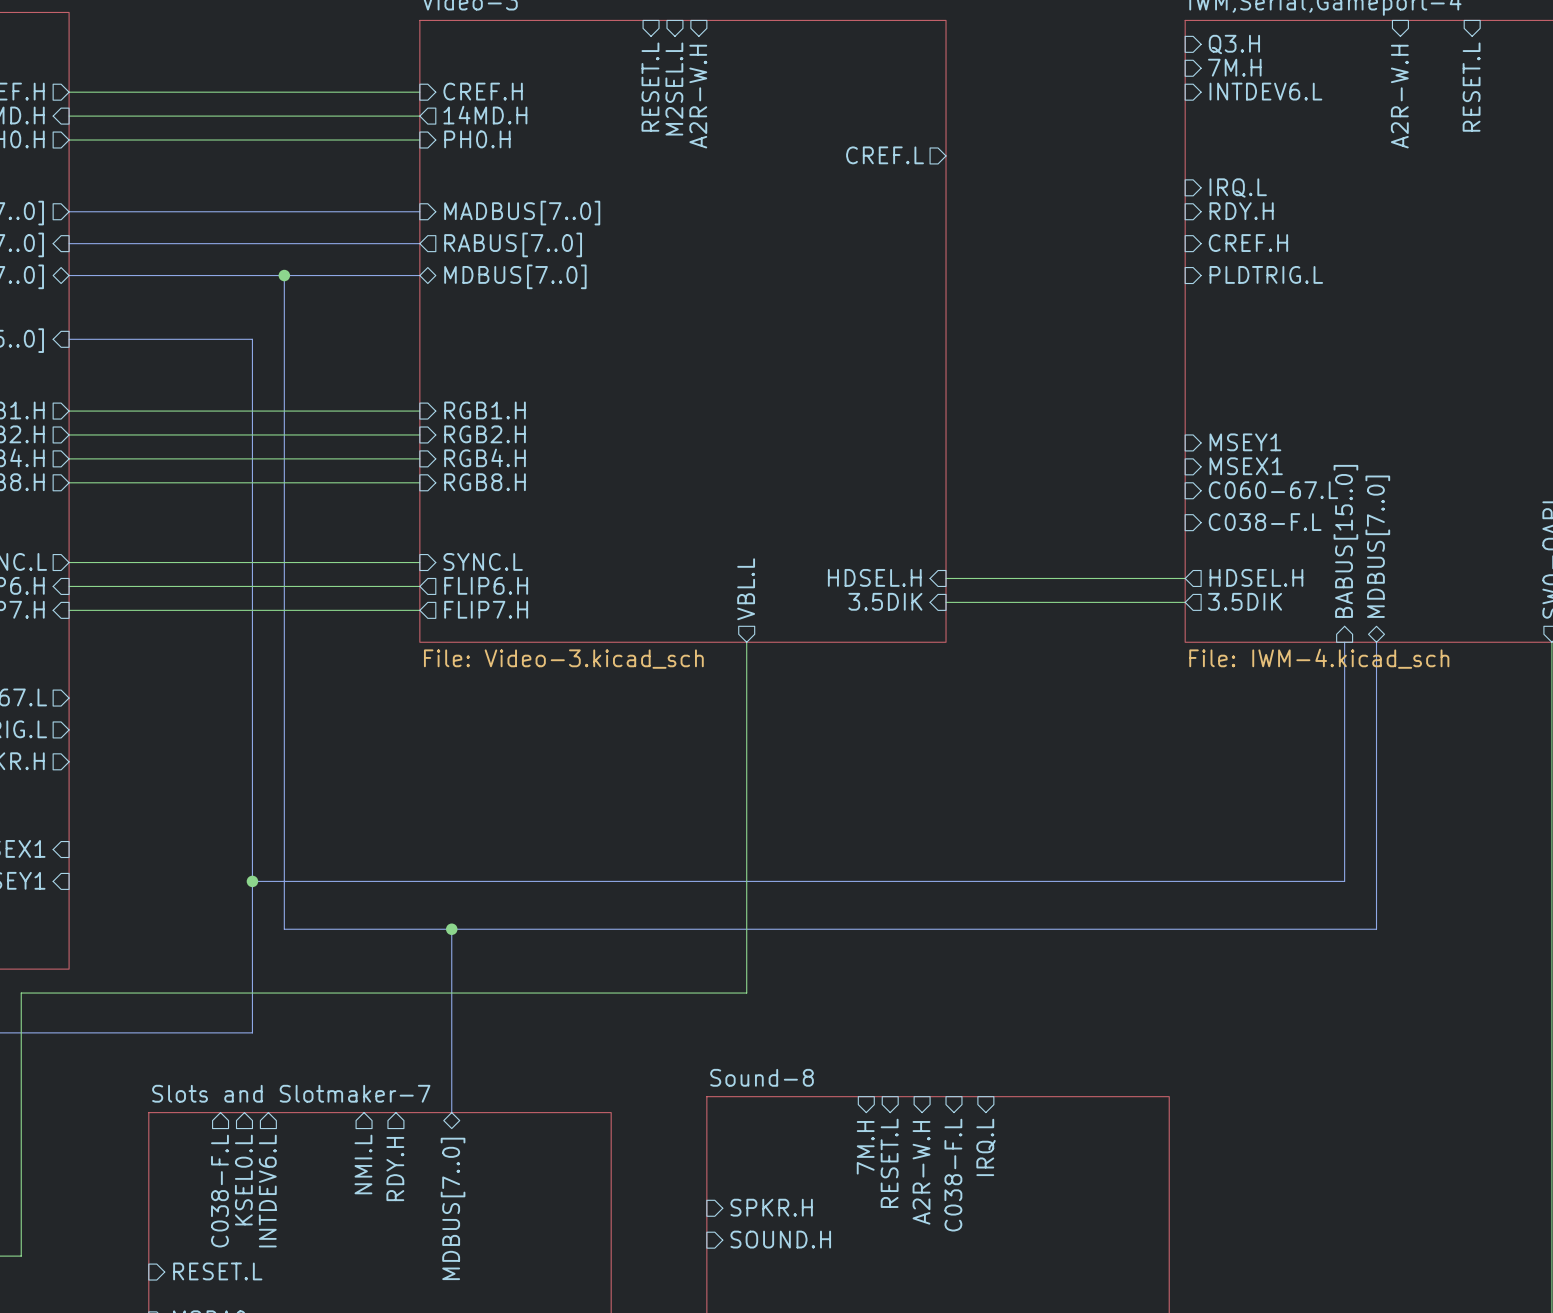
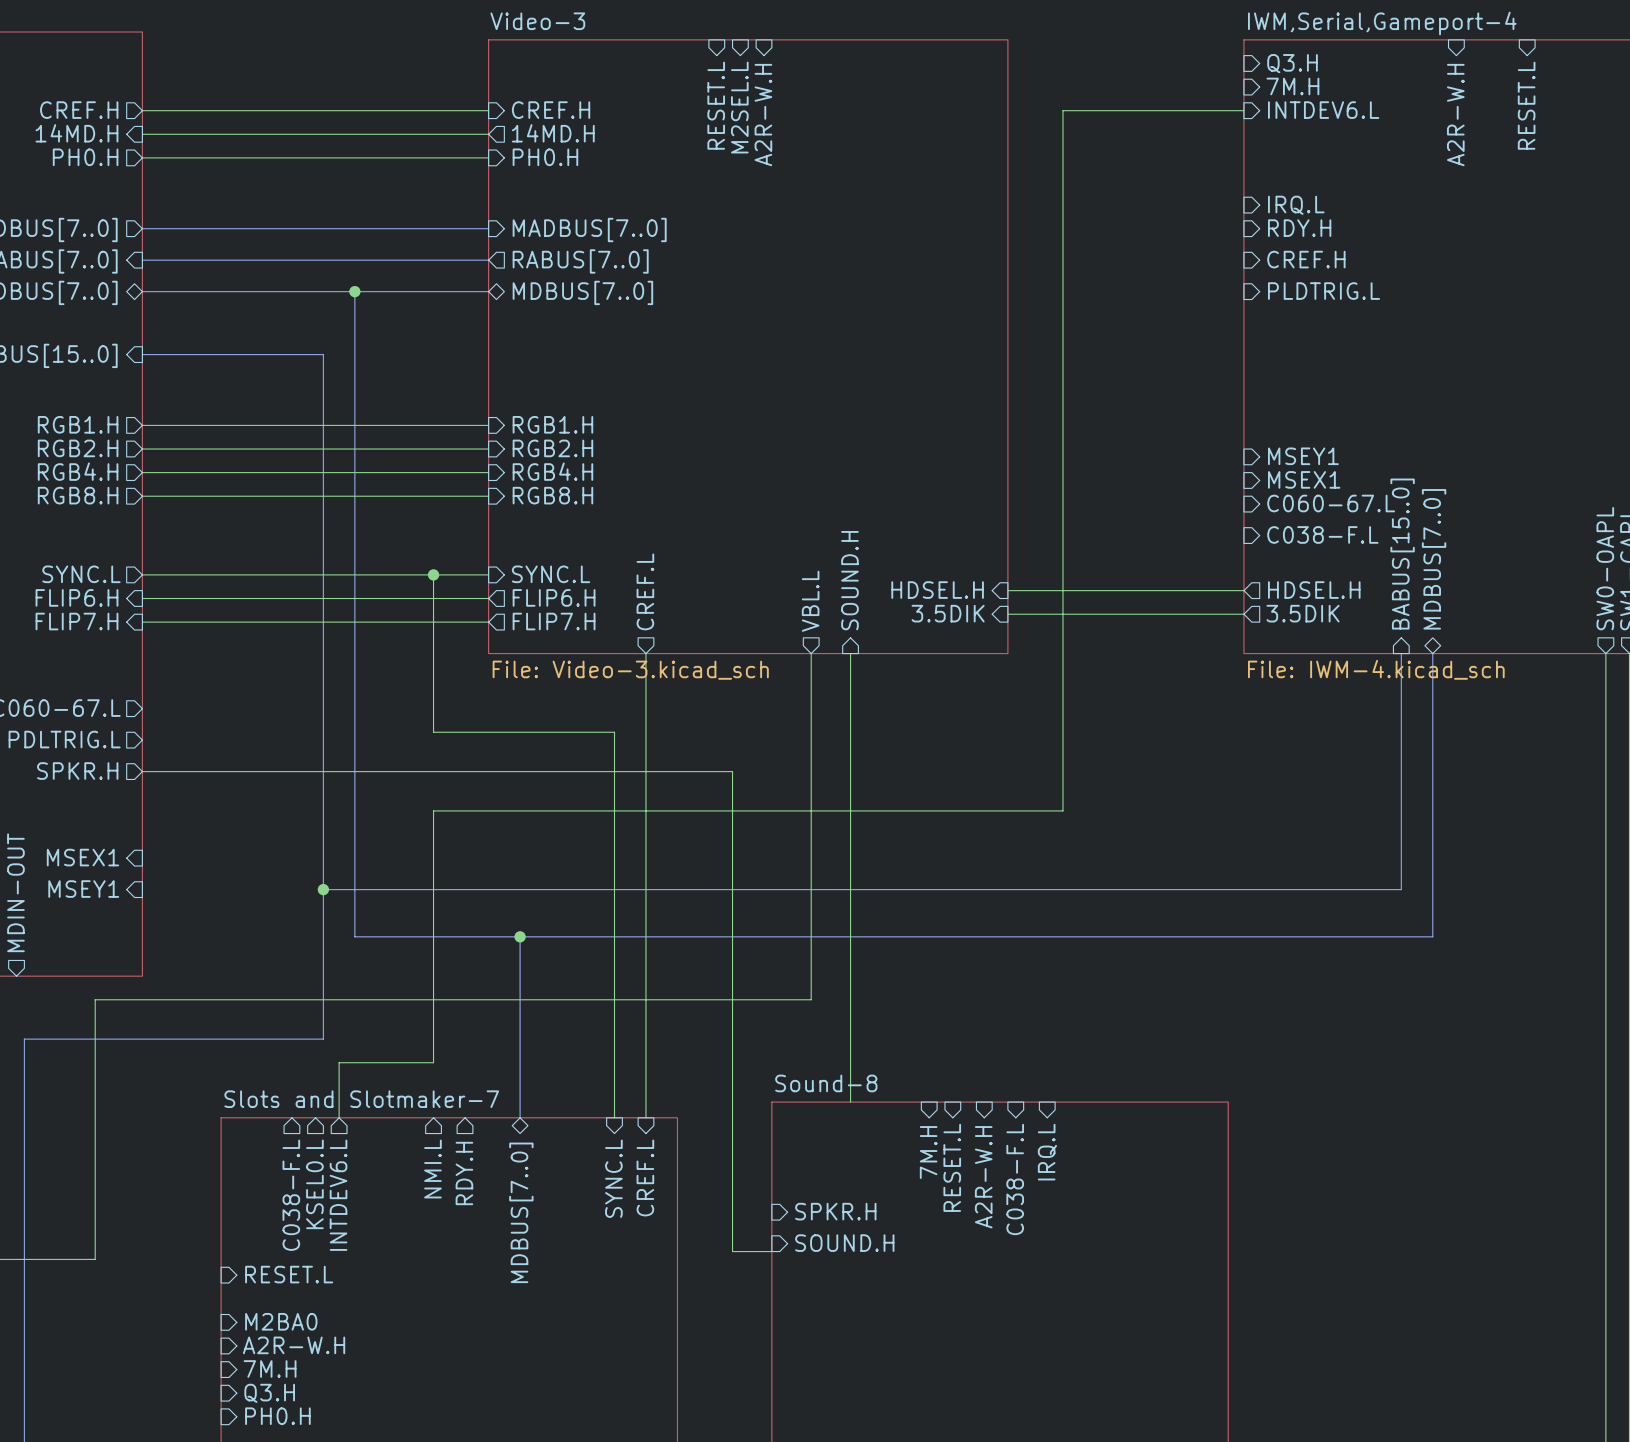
wire: none -> (1243, 110) (1062, 110) (1062, 810) (433, 810) (433, 1062) (339, 1062) (339, 1117)
sheet pin: CREF.L (885, 155) -> none
wire: none -> (433, 574) (433, 732) (614, 732) (614, 1117)
junction: none -> (433, 574)
sheet pin: none -> SOUND.H (849, 580)
sheet pin: none -> CREF.L (645, 591)
wire: none -> (645, 653) (645, 1117)
wire: none -> (850, 653) (850, 1102)
wire: none -> (142, 771) (732, 771) (732, 1251) (771, 1251)
sheet pin: none -> CREF.L (645, 1177)
sheet pin: none -> SYNC.L (613, 1178)

